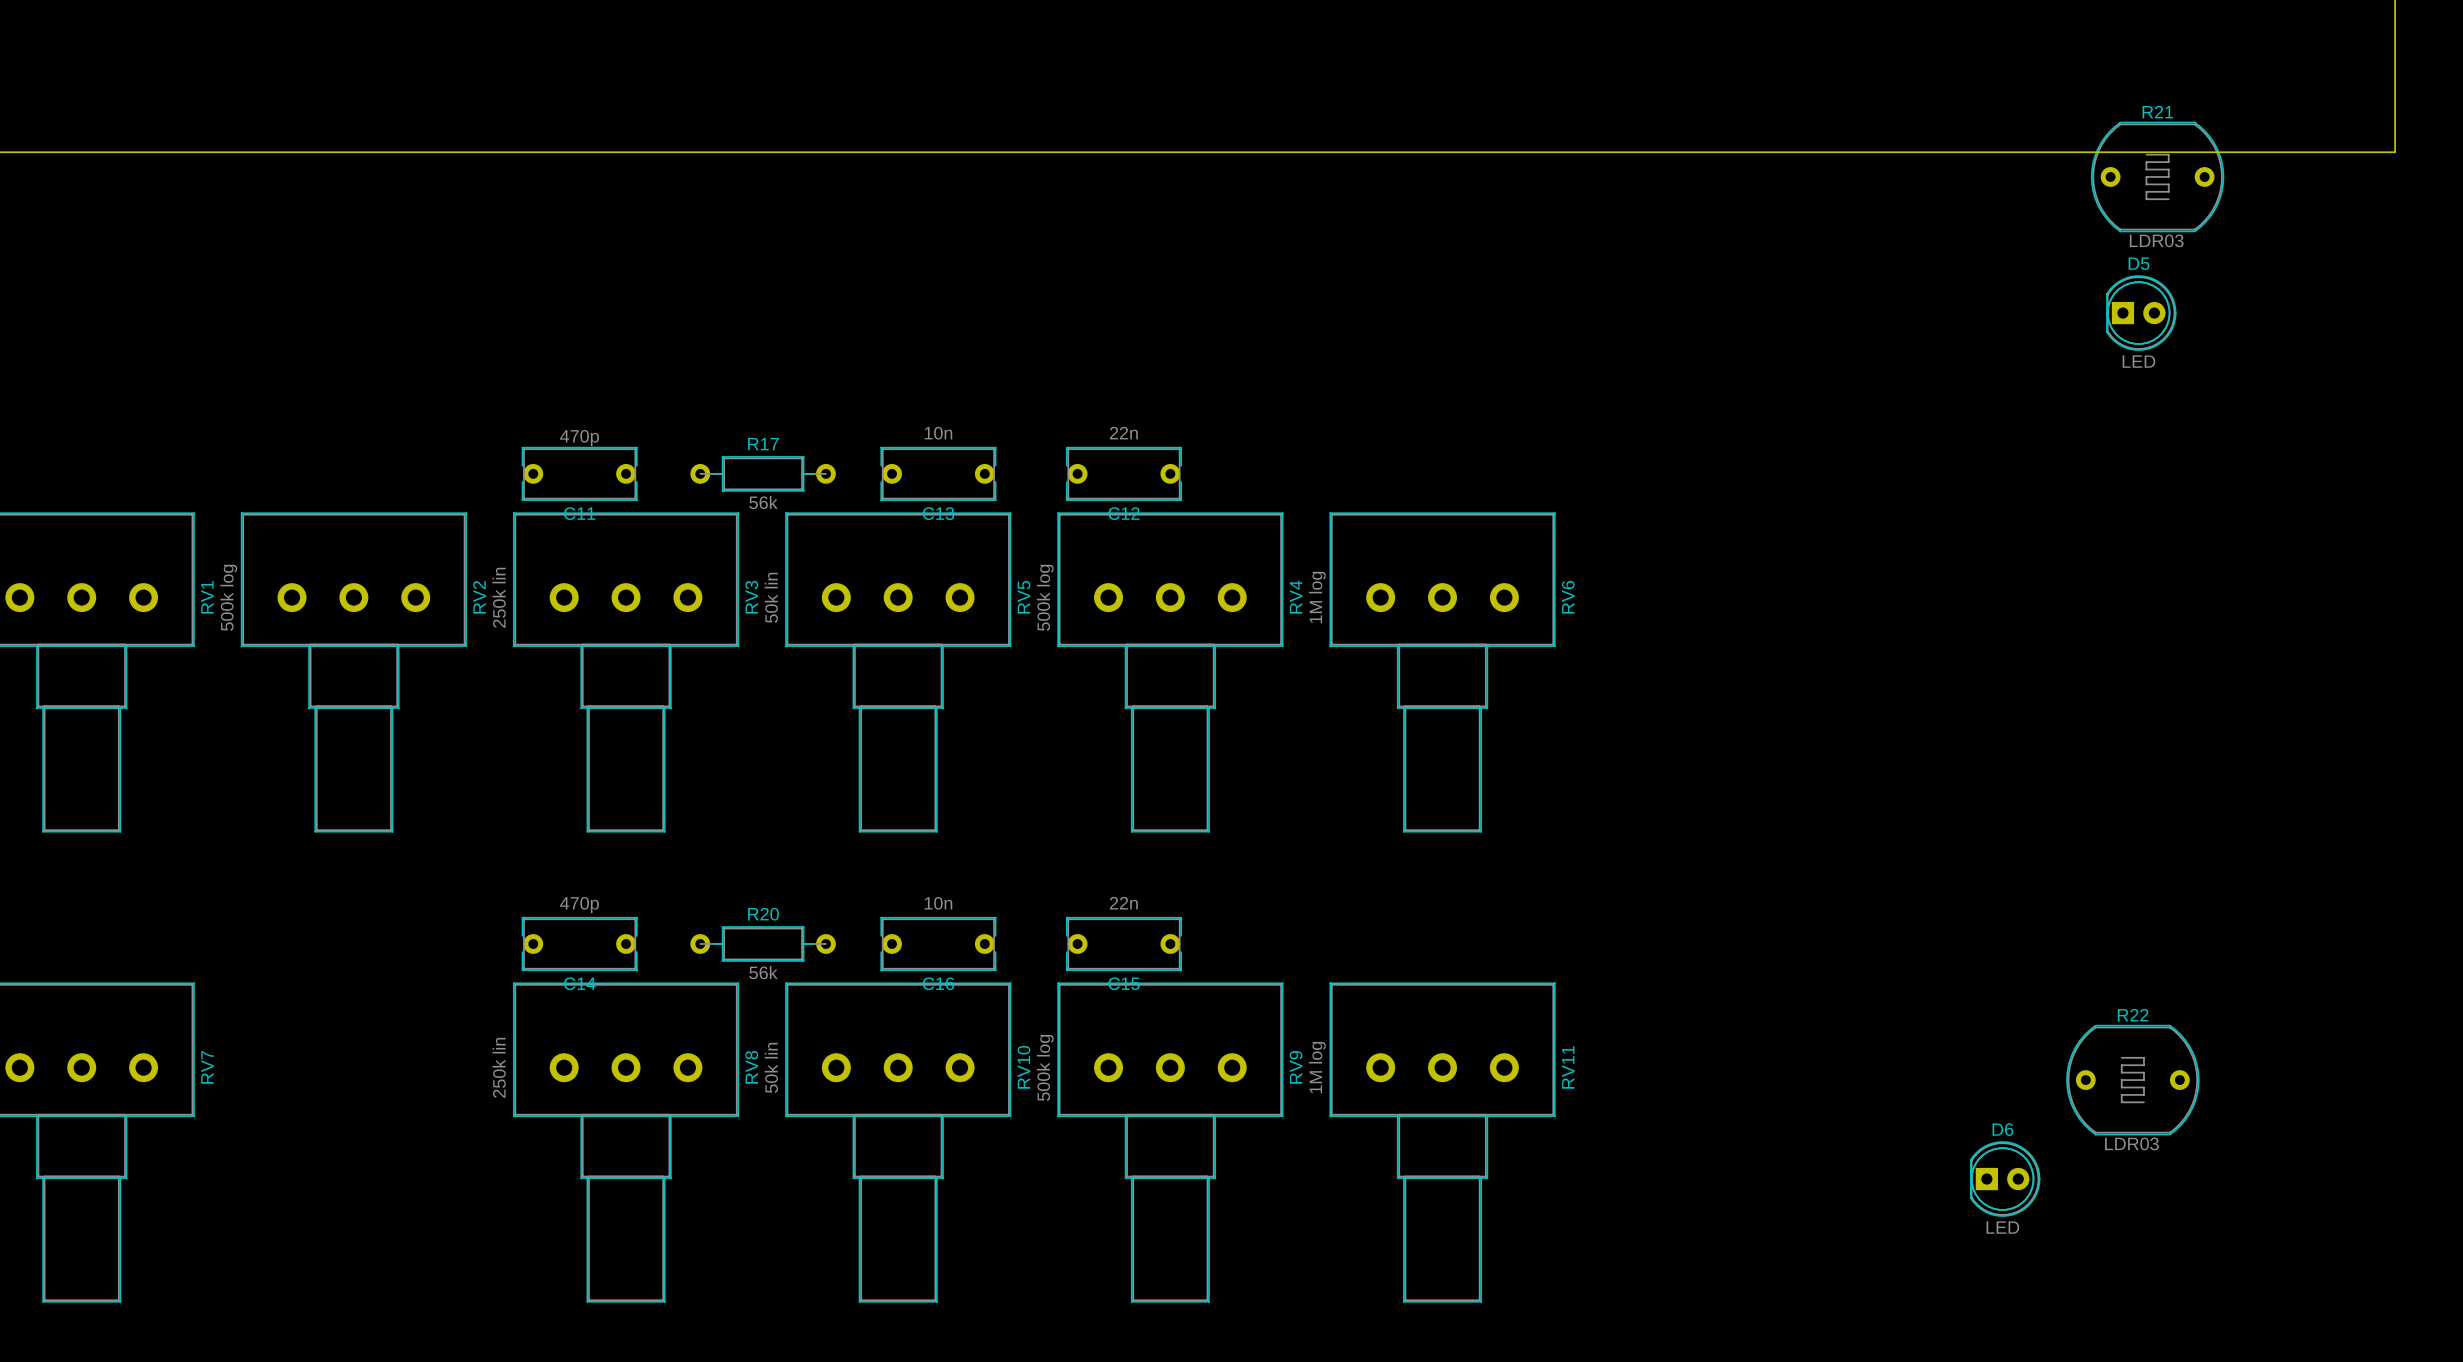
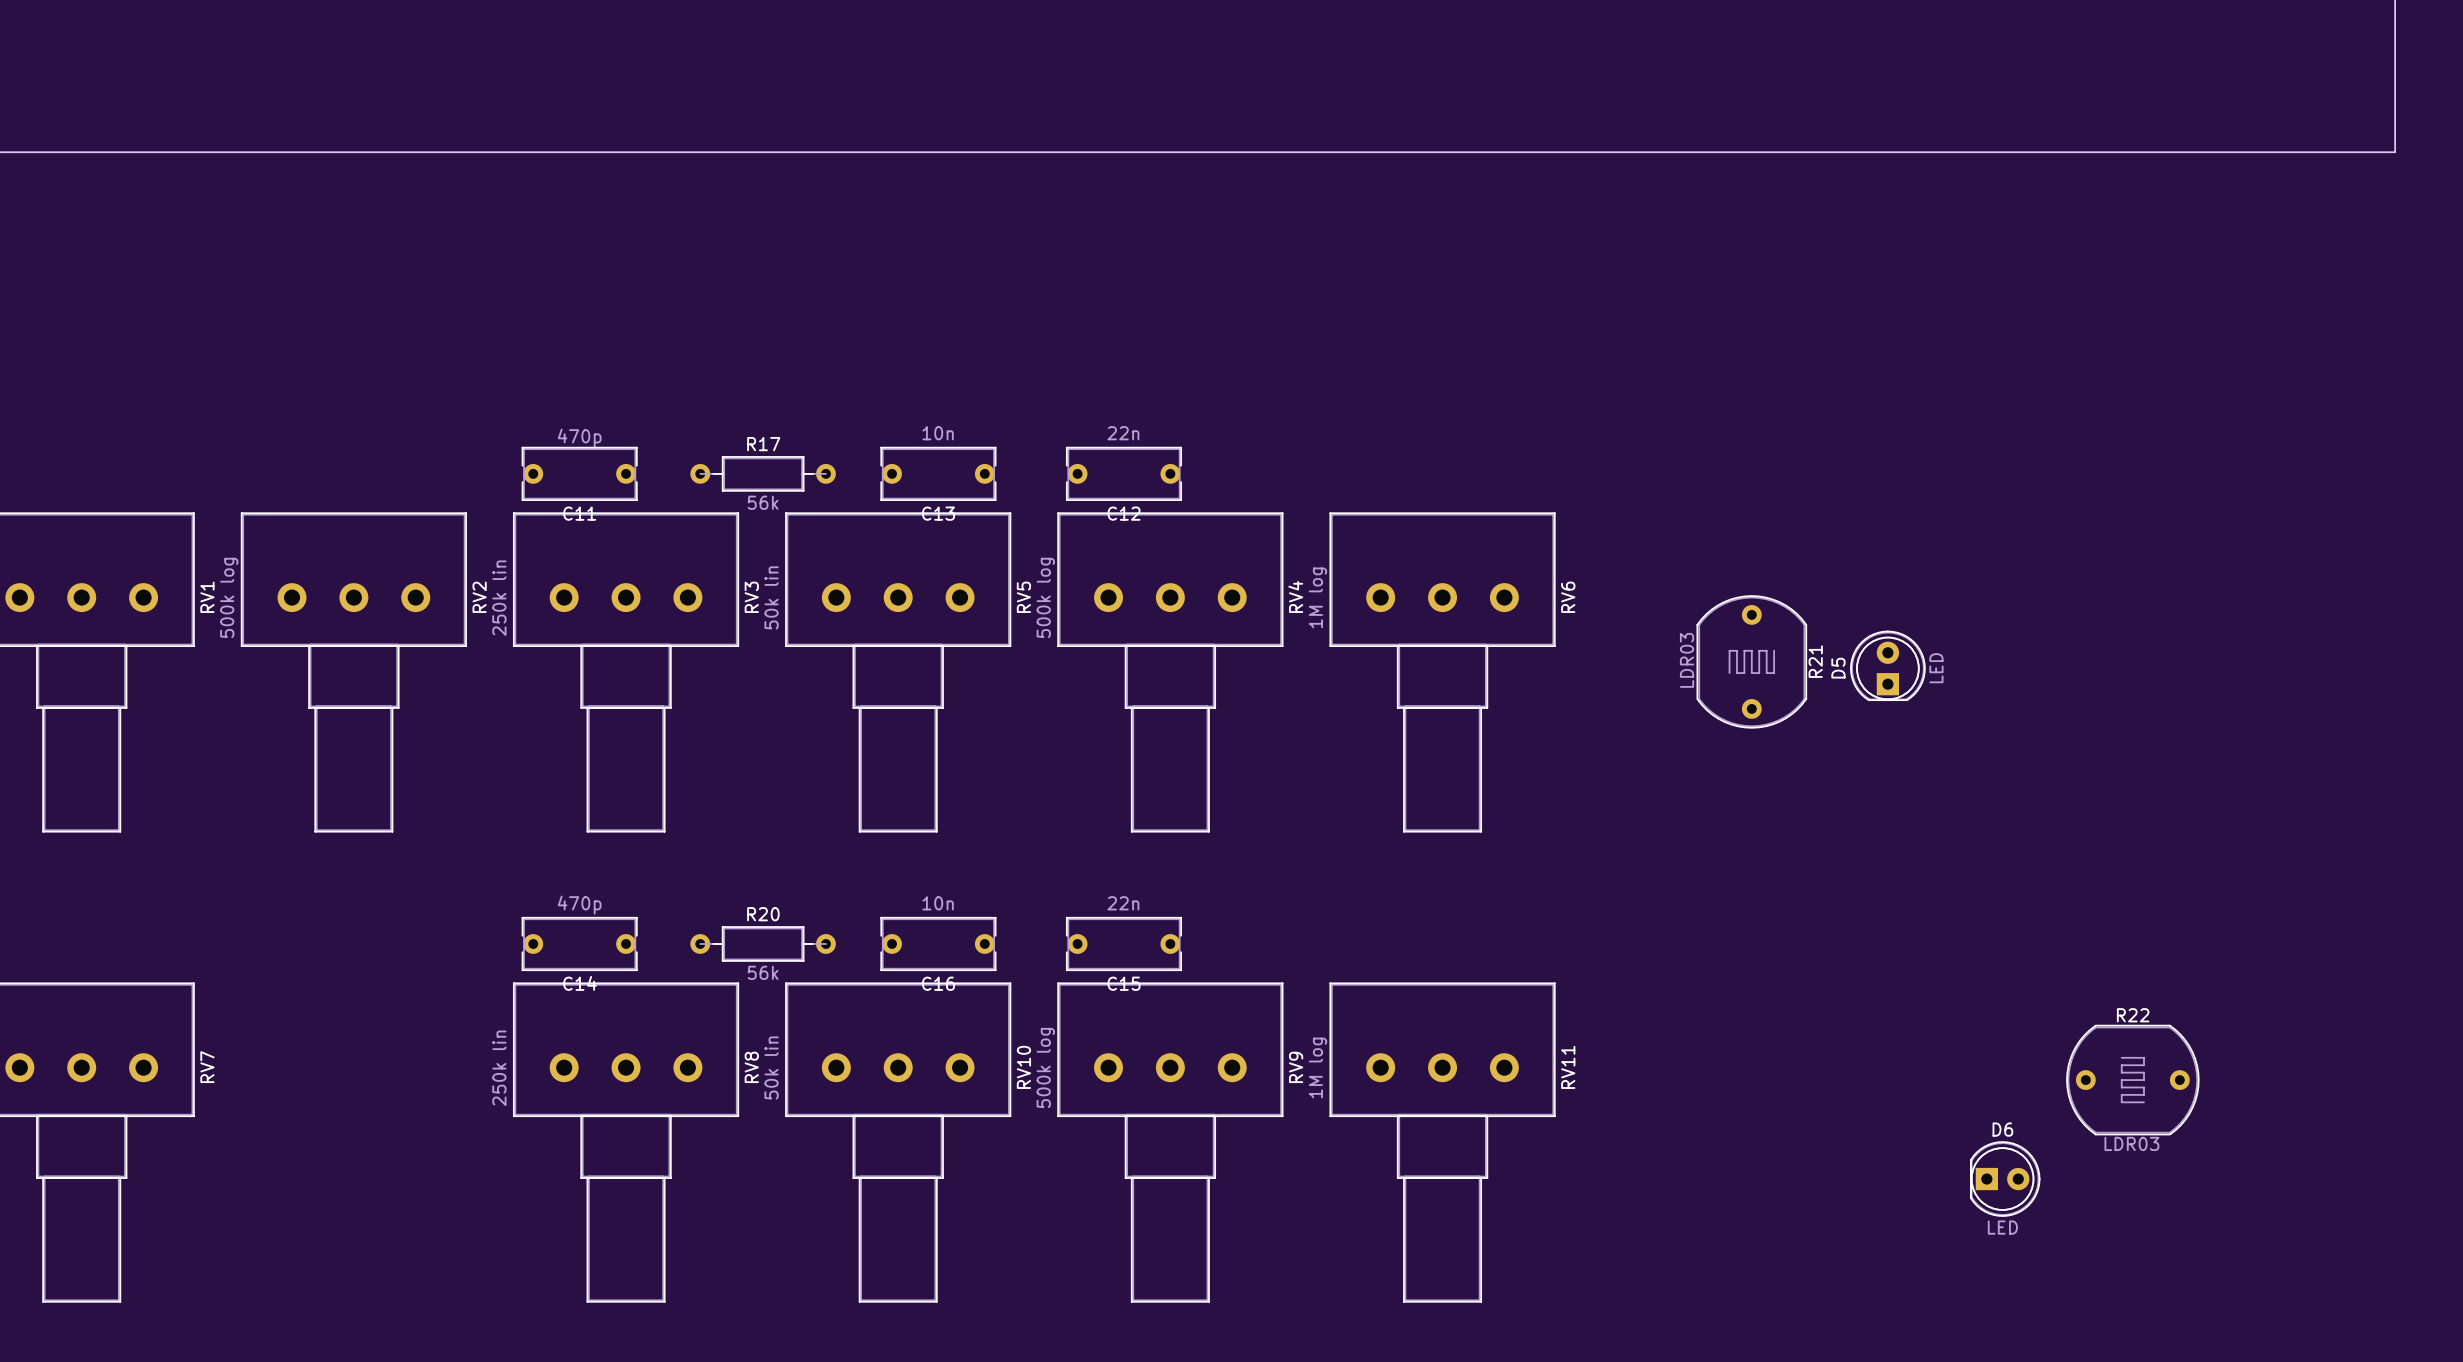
R21 rotation: 0° (2157, 176) -> 90° clockwise (1751, 661)
R21 position: (2157, 176) -> (1751, 661)
D5 rotation: 0° (2141, 313) -> 90° counterclockwise (1887, 665)
D5 position: (2141, 313) -> (1887, 665)

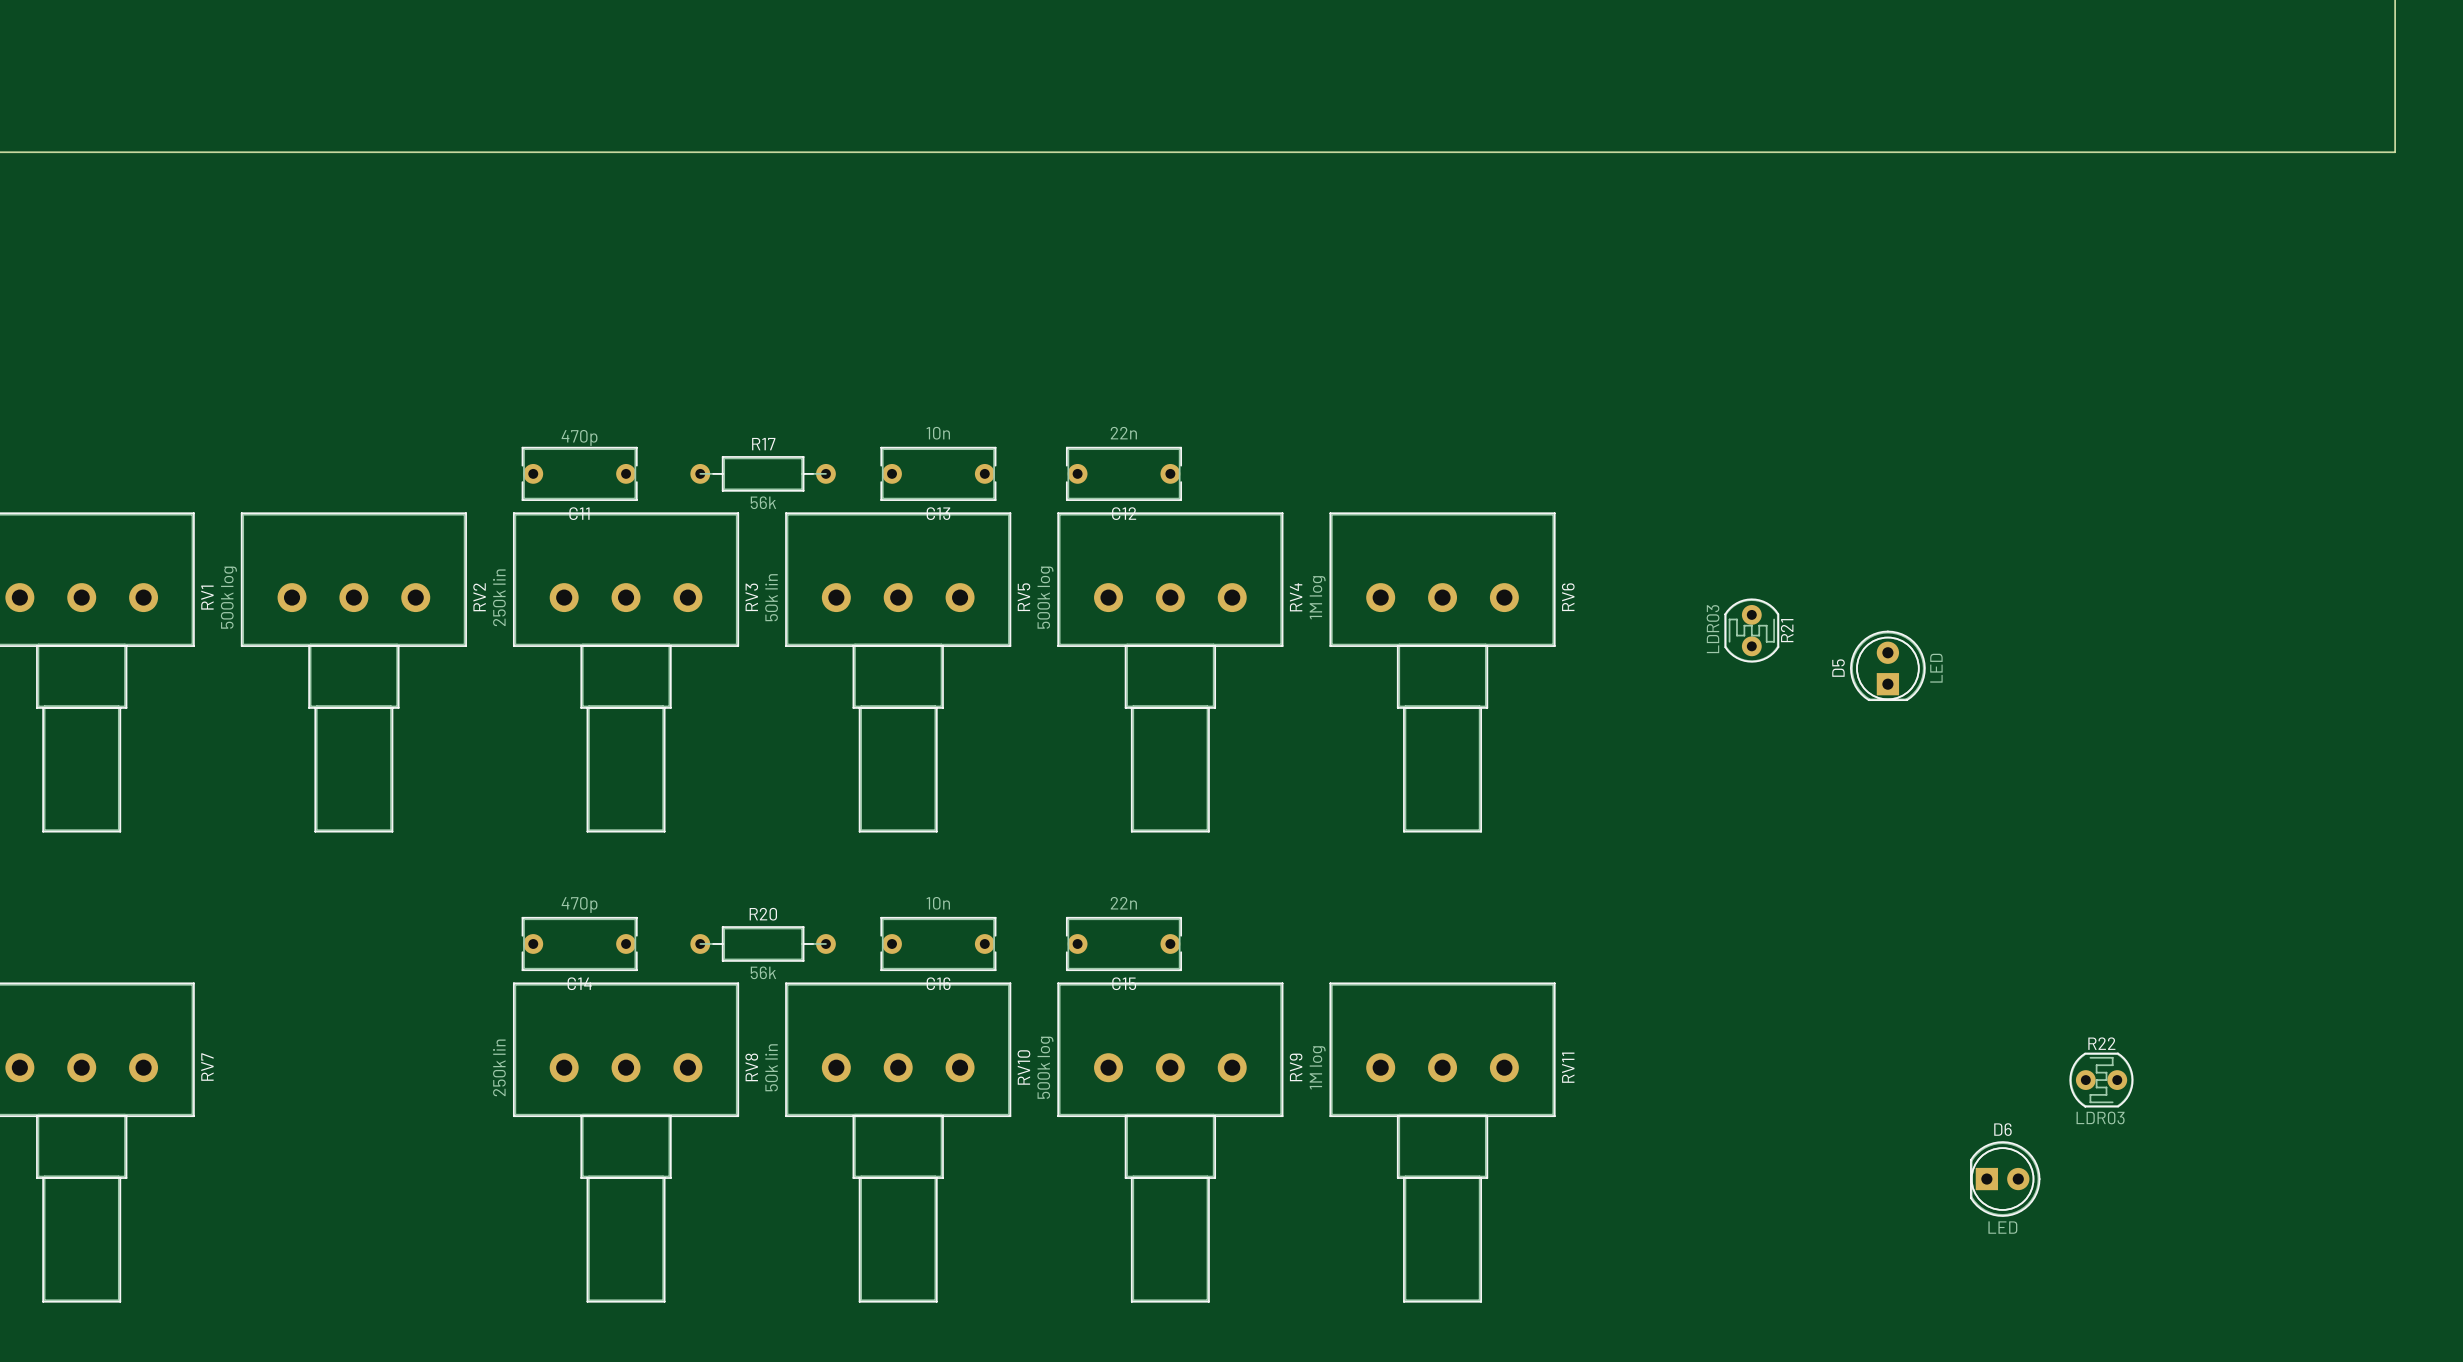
R21 footprint: [1696, 595, 1807, 729] -> [1724, 598, 1780, 663]
R21 value position: LDR03 (1687, 660) -> LDR03 (1713, 629)
R21 name position: R21 (1815, 661) -> R21 (1787, 630)
R22 name position: R22 (2133, 1015) -> R22 (2101, 1043)
R22 footprint: [2066, 1024, 2200, 1136] -> [2069, 1052, 2134, 1108]
R22 value position: LDR03 (2131, 1143) -> LDR03 (2100, 1117)

